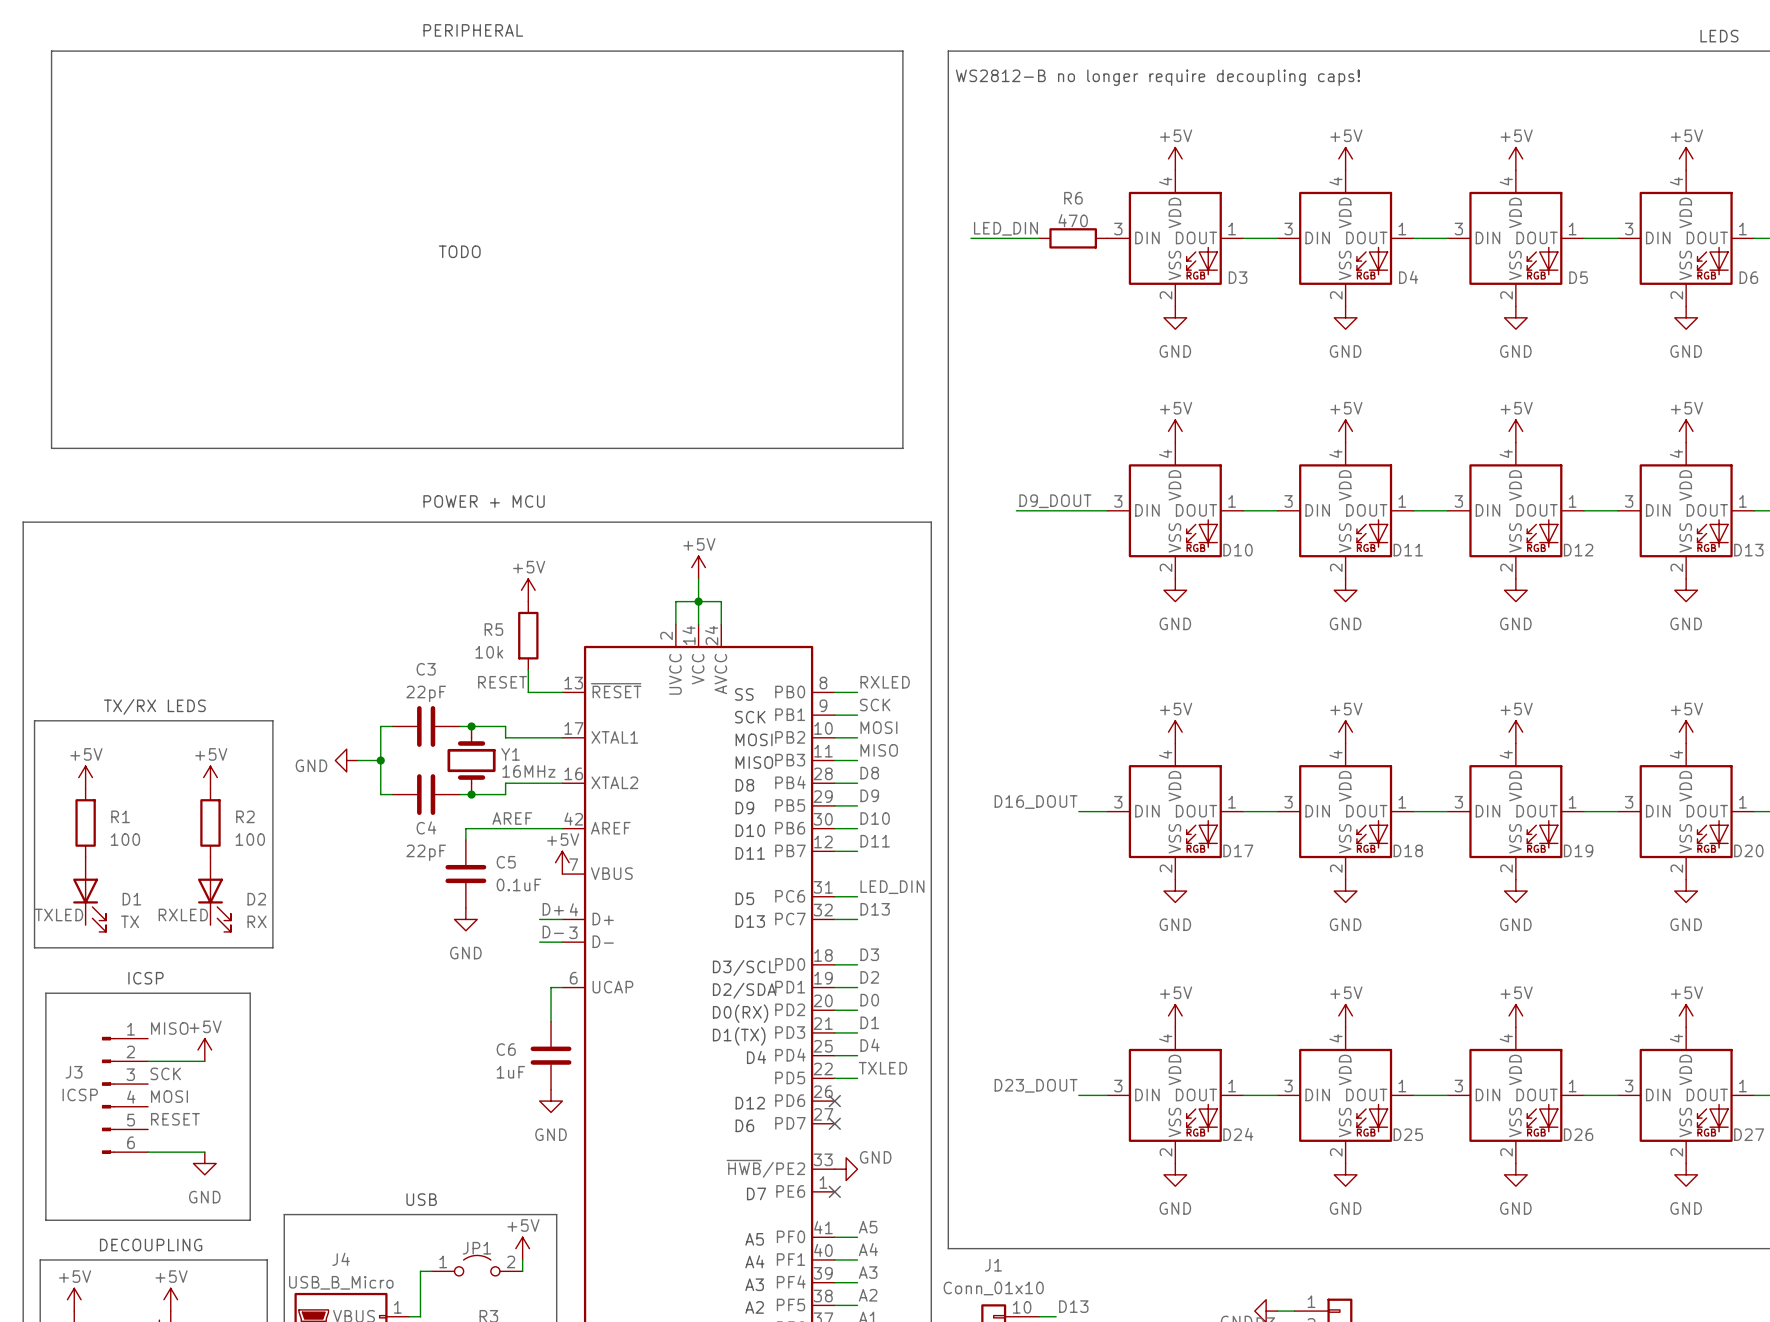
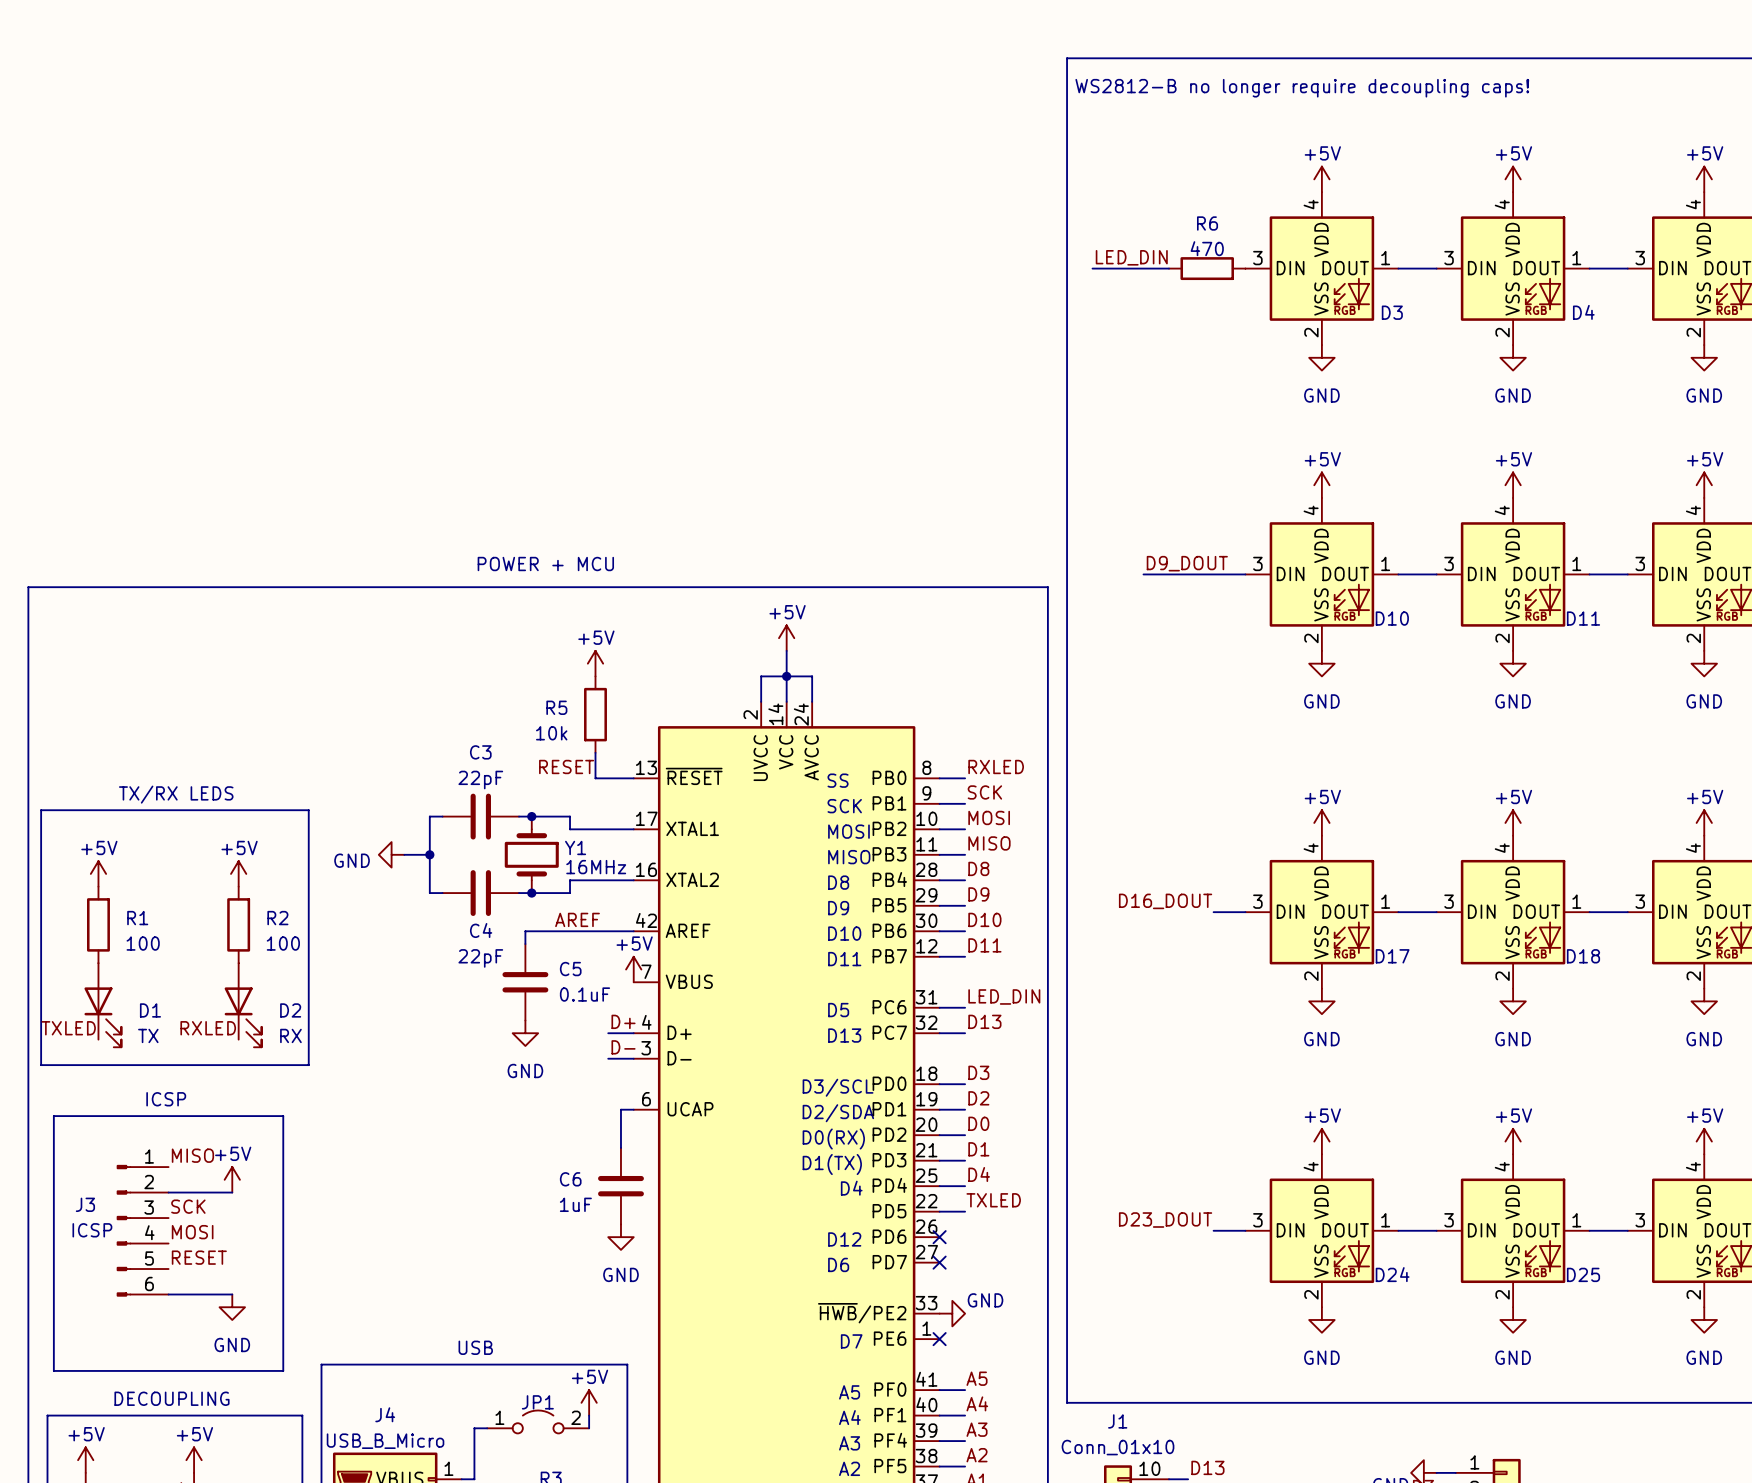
text: PERIPHERAL (473, 30) -> none
line: (51, 51) (902, 51) (902, 448) (51, 448) (51, 51) -> none
text: TODO (459, 251) -> none

